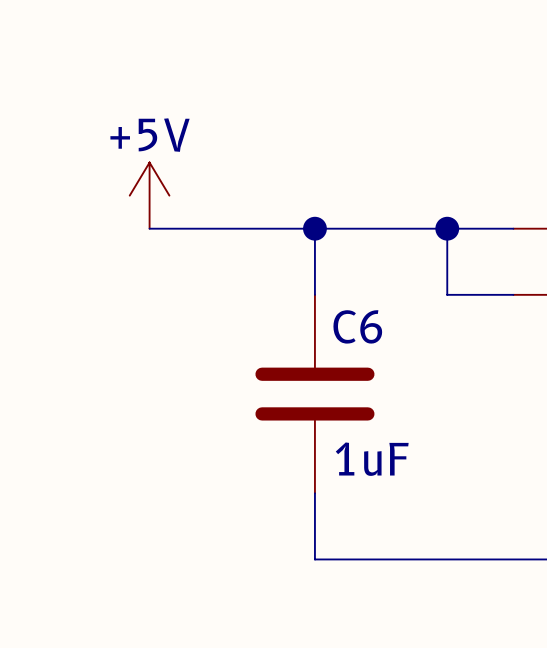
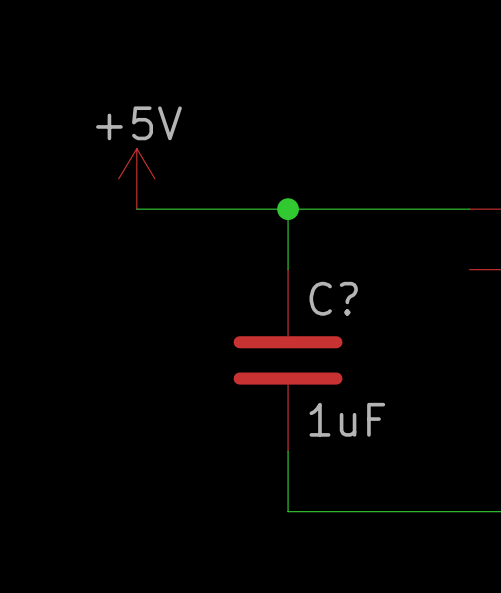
wire: (447, 228) (447, 294) (513, 294) -> none
junction: (447, 228) -> none
C6 name: C6 (357, 326) -> C? (333, 298)

